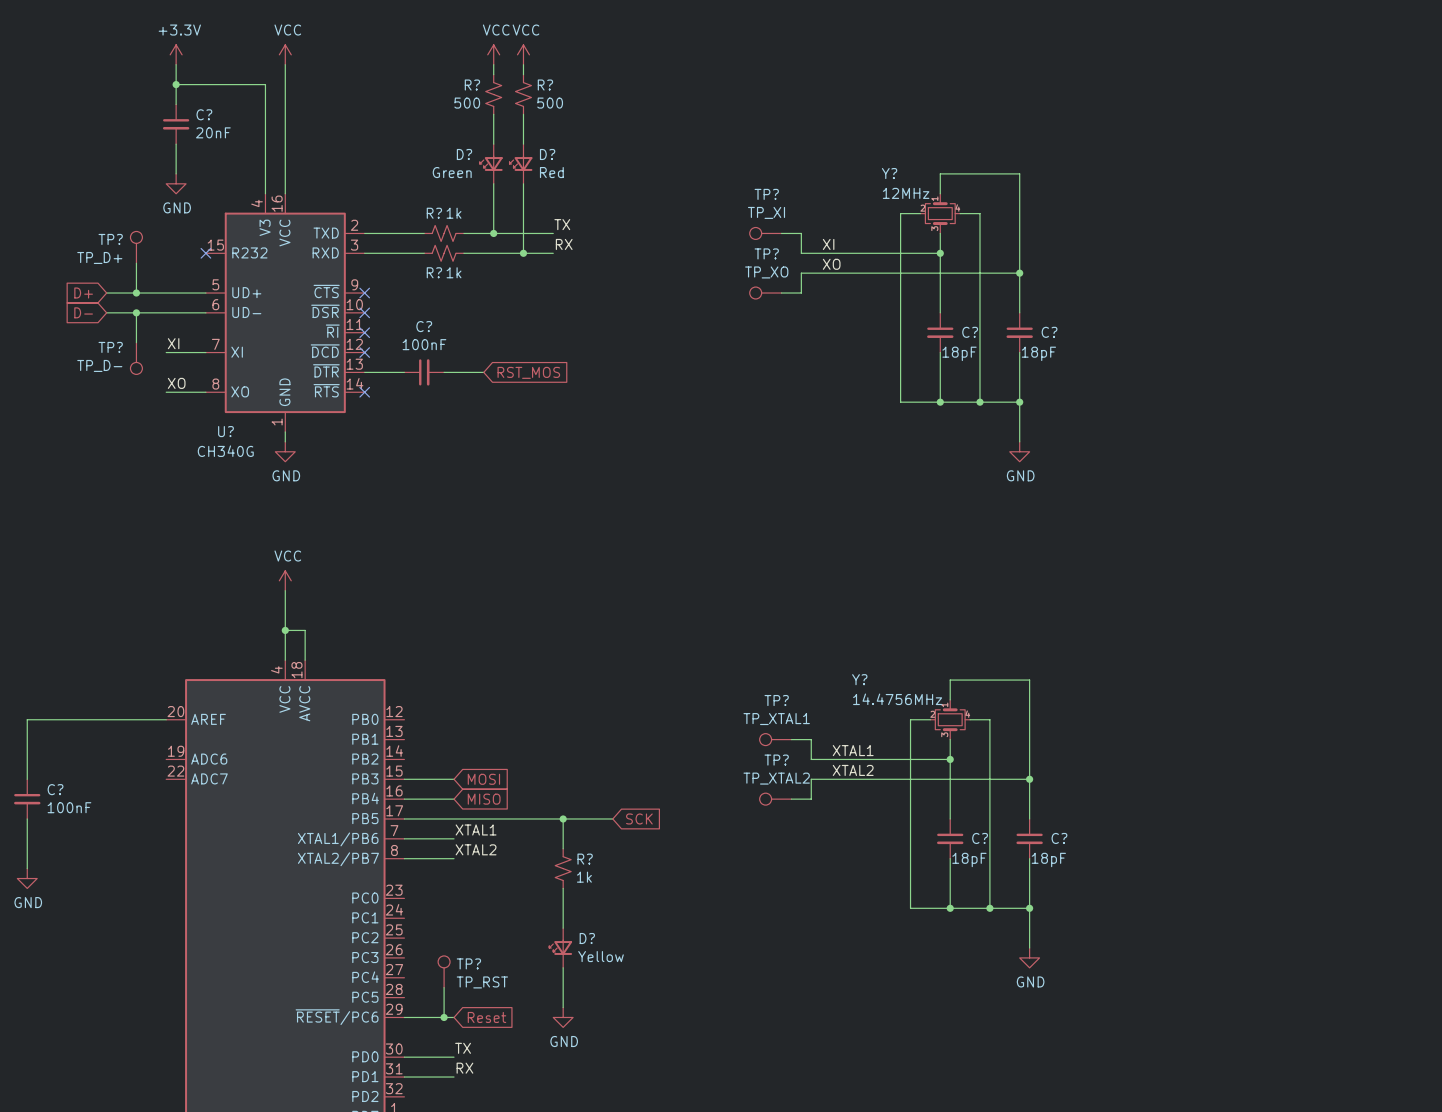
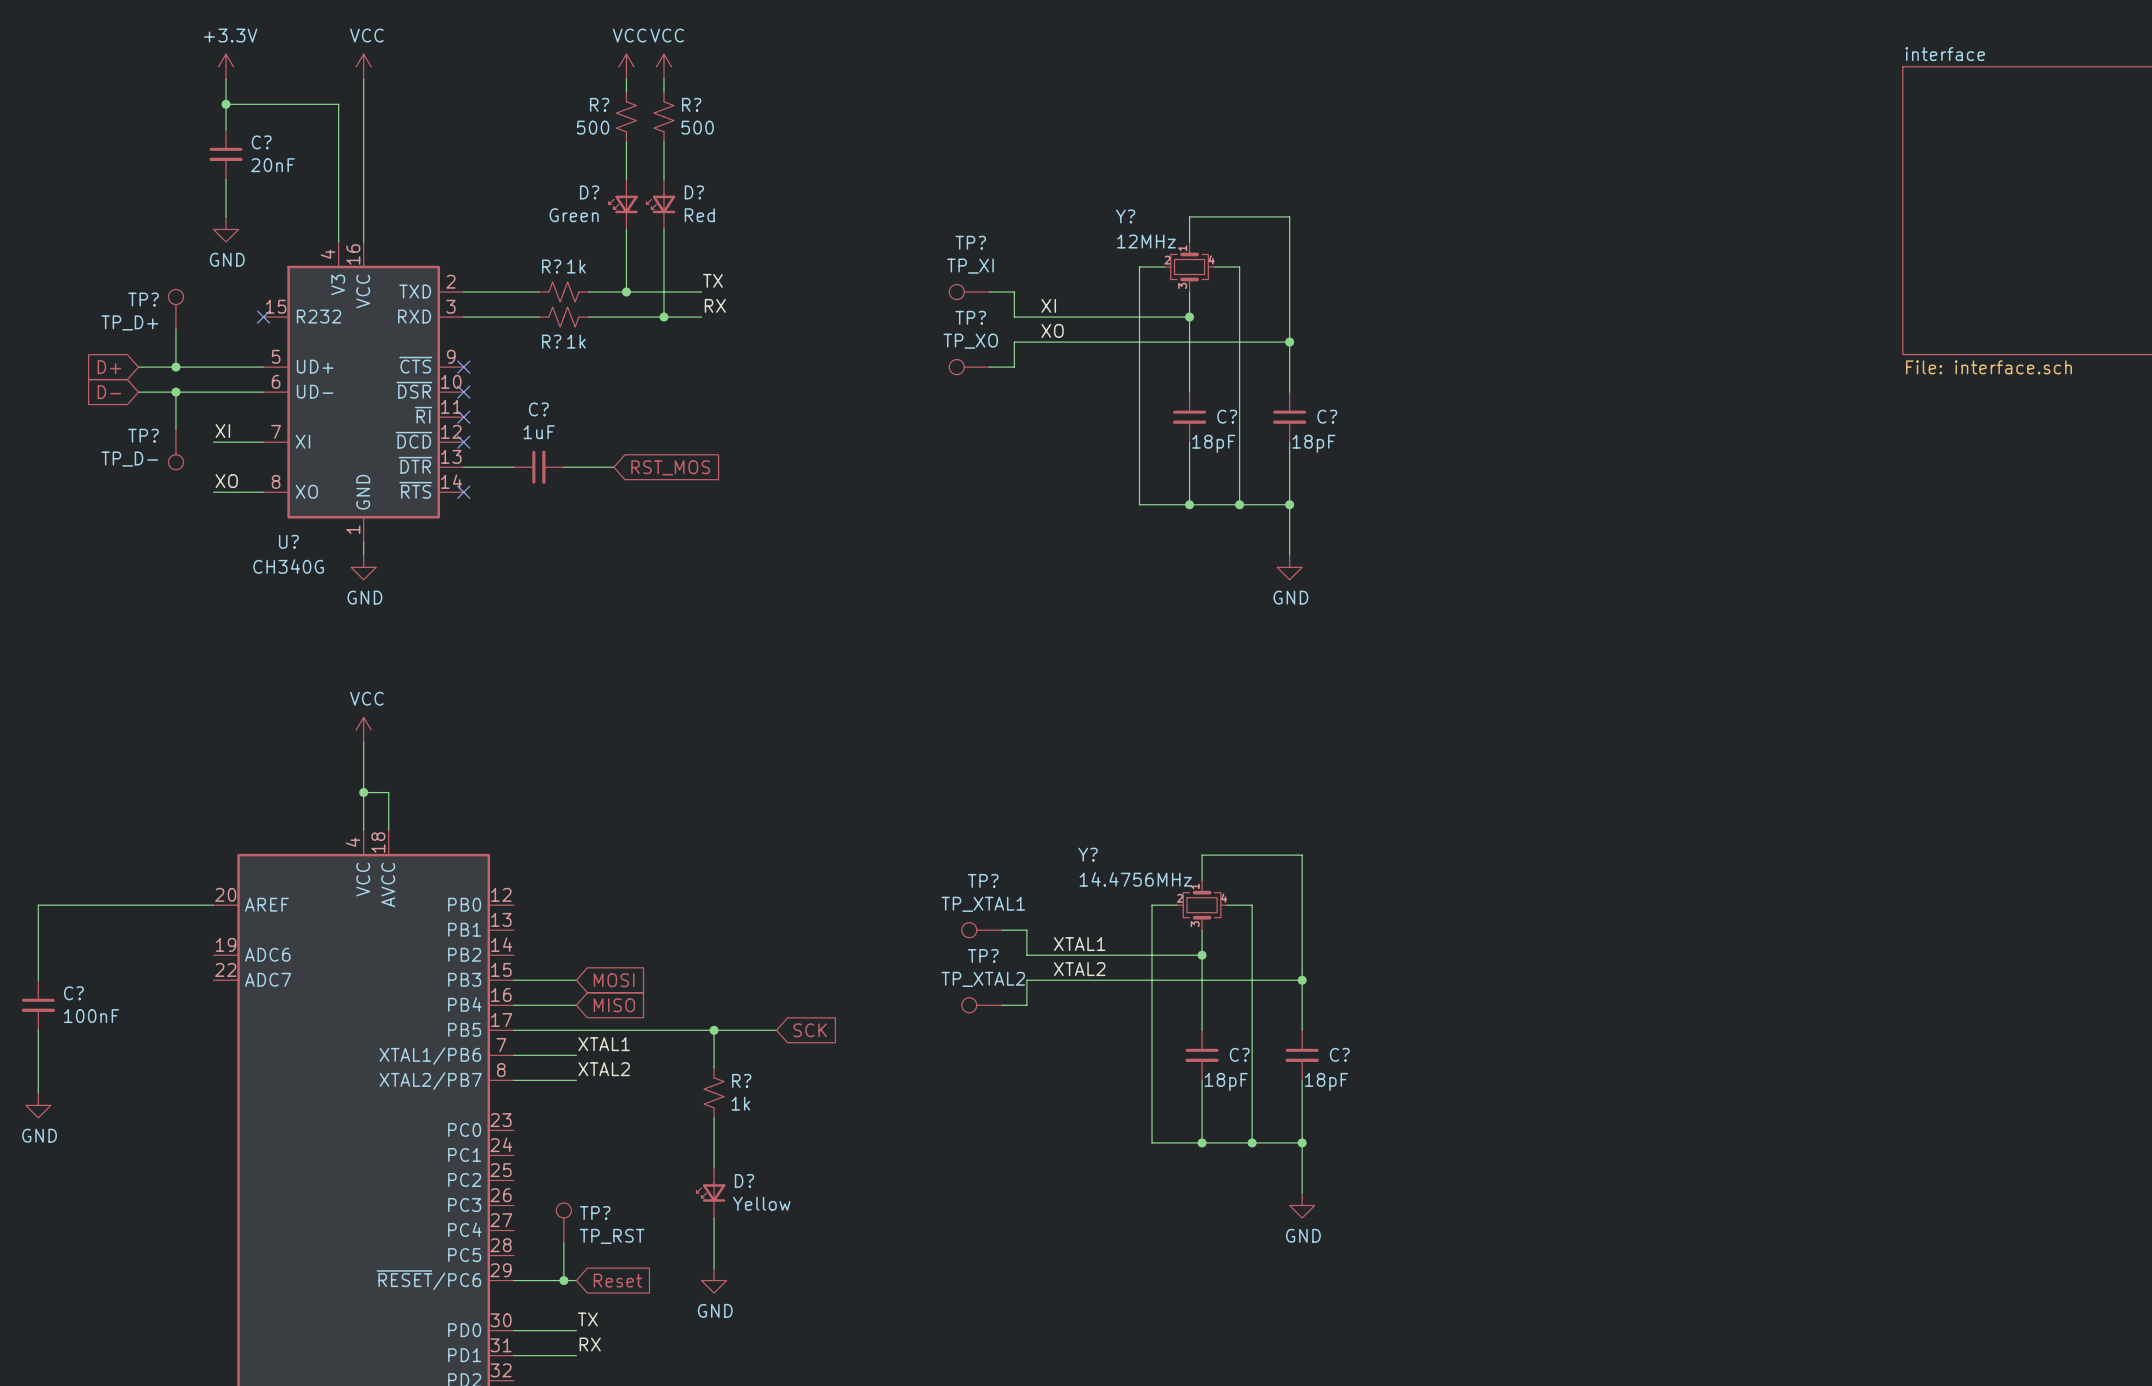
C? value: 100nF (424, 344) -> 1uF (539, 432)

